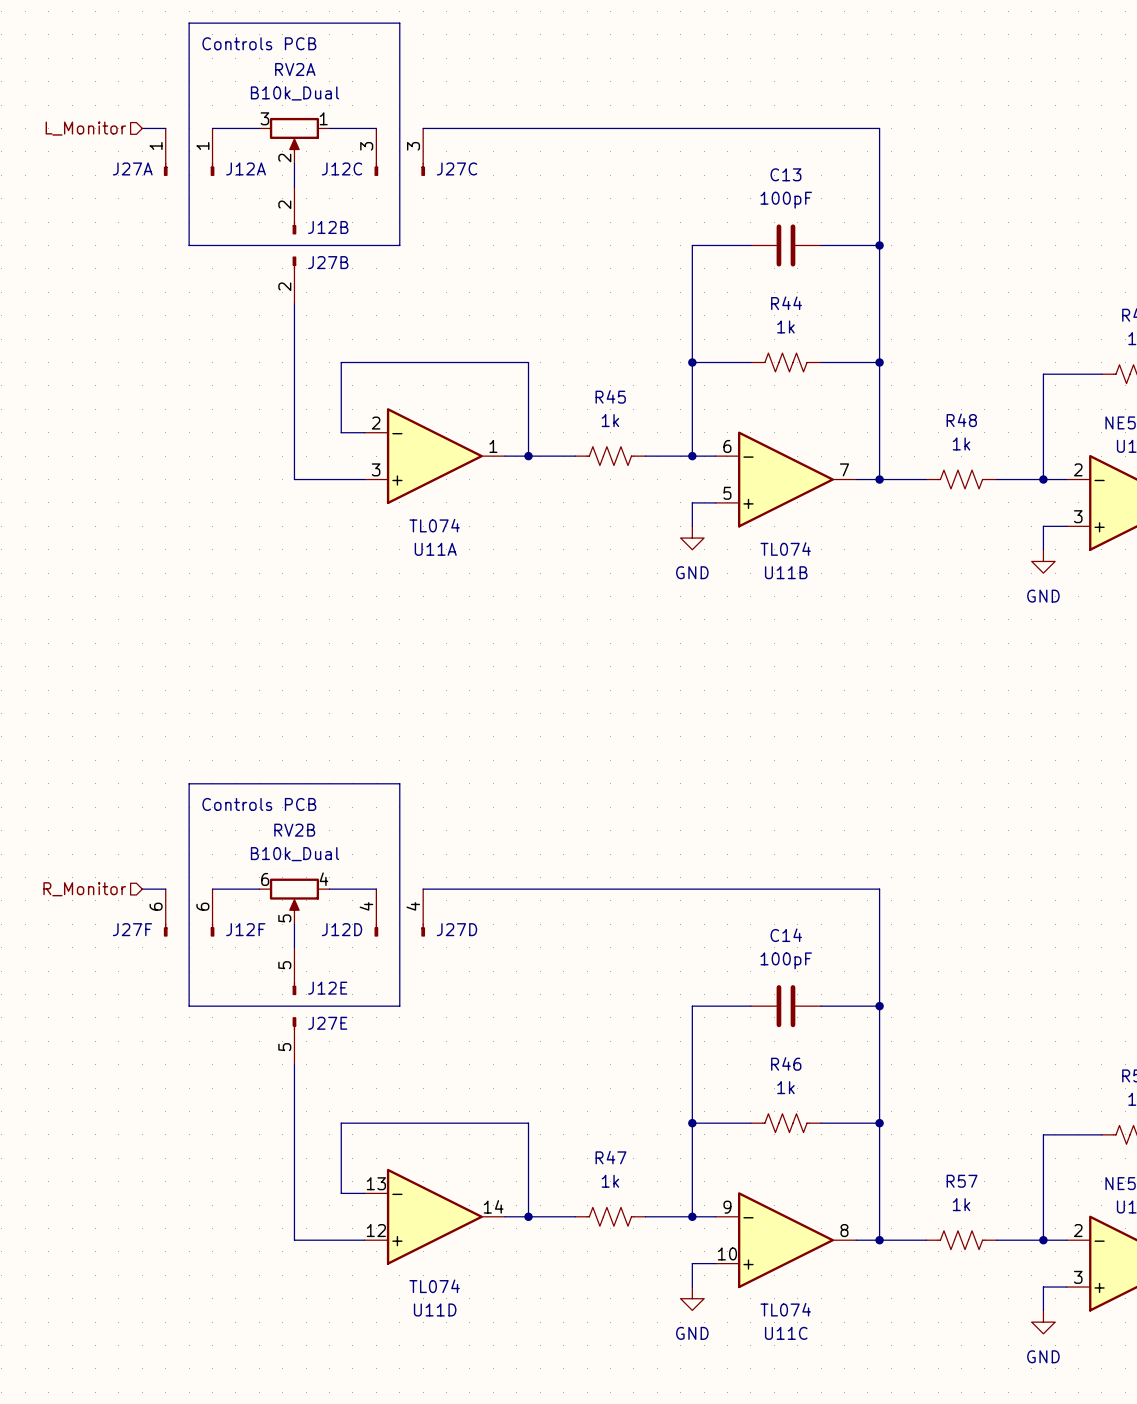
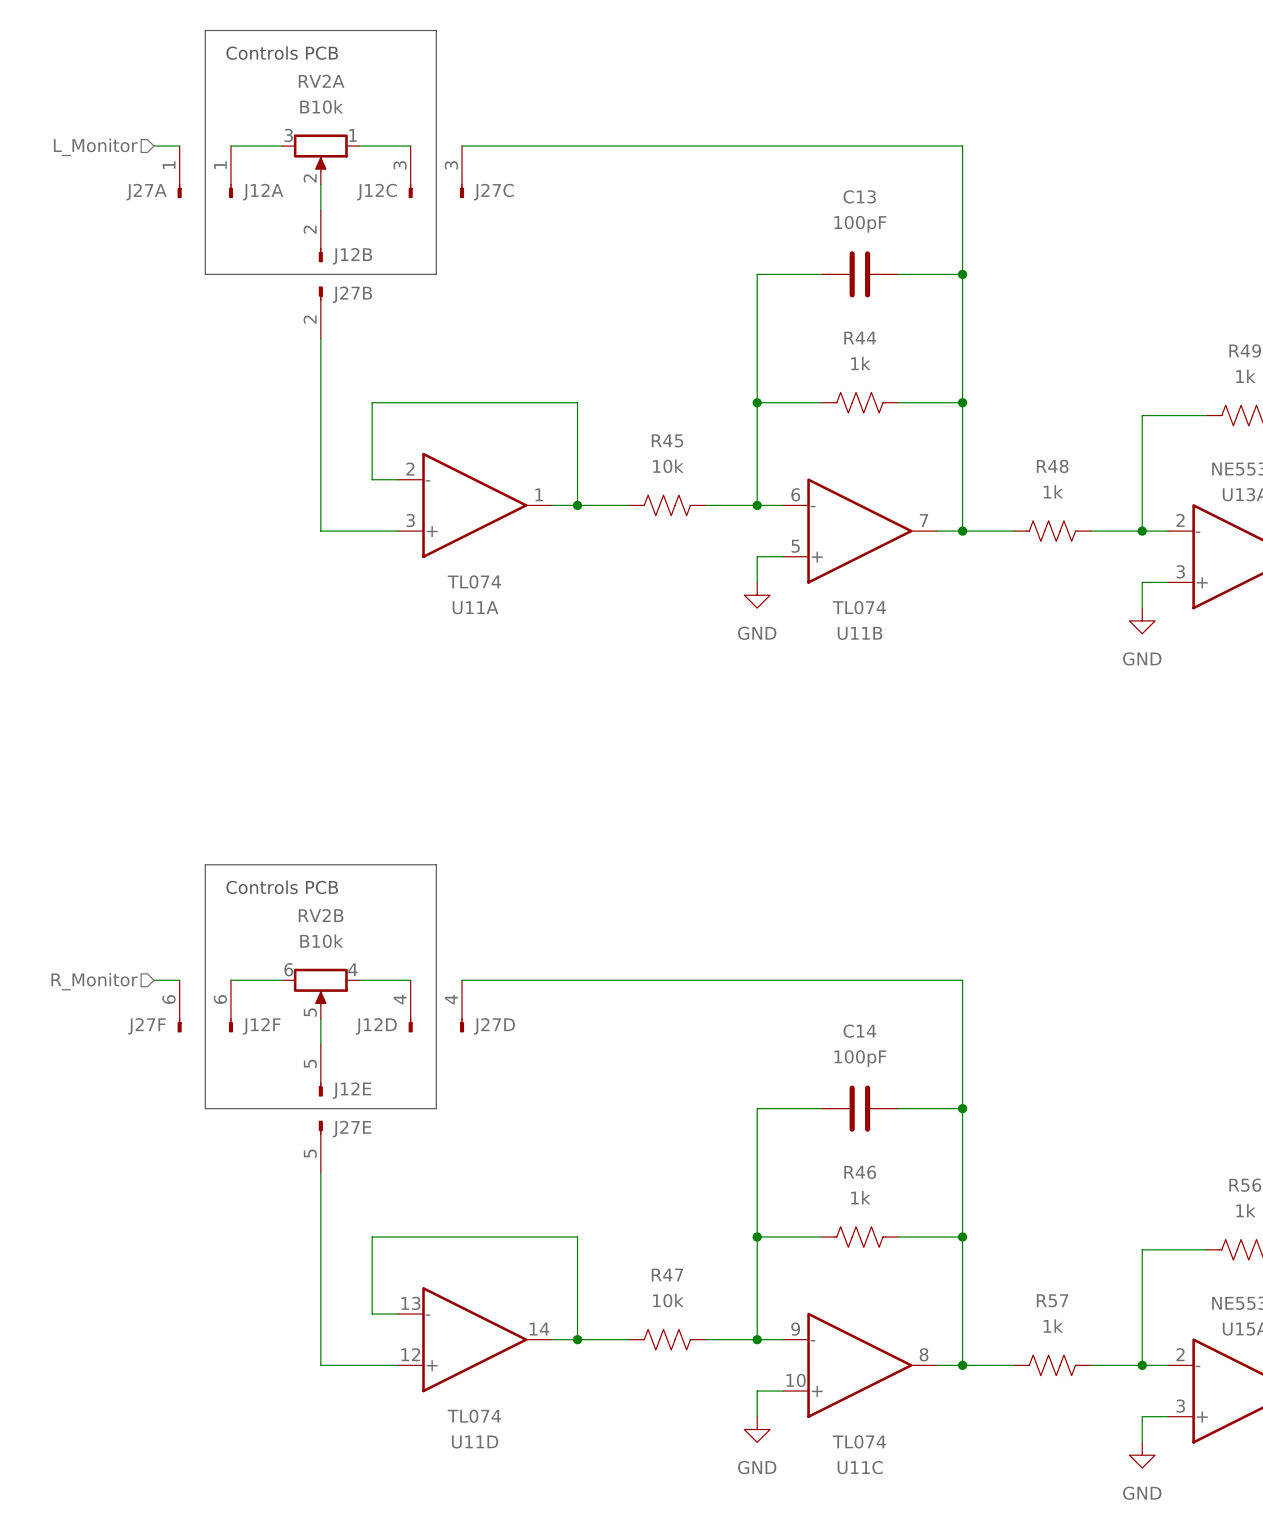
RV2A value: B10k_Dual (295, 93) -> B10k (321, 106)
R45 value: 1k (610, 420) -> 10k (668, 466)
RV2B value: B10k_Dual (295, 854) -> B10k (321, 941)
R47 value: 1k (610, 1181) -> 10k (668, 1300)

